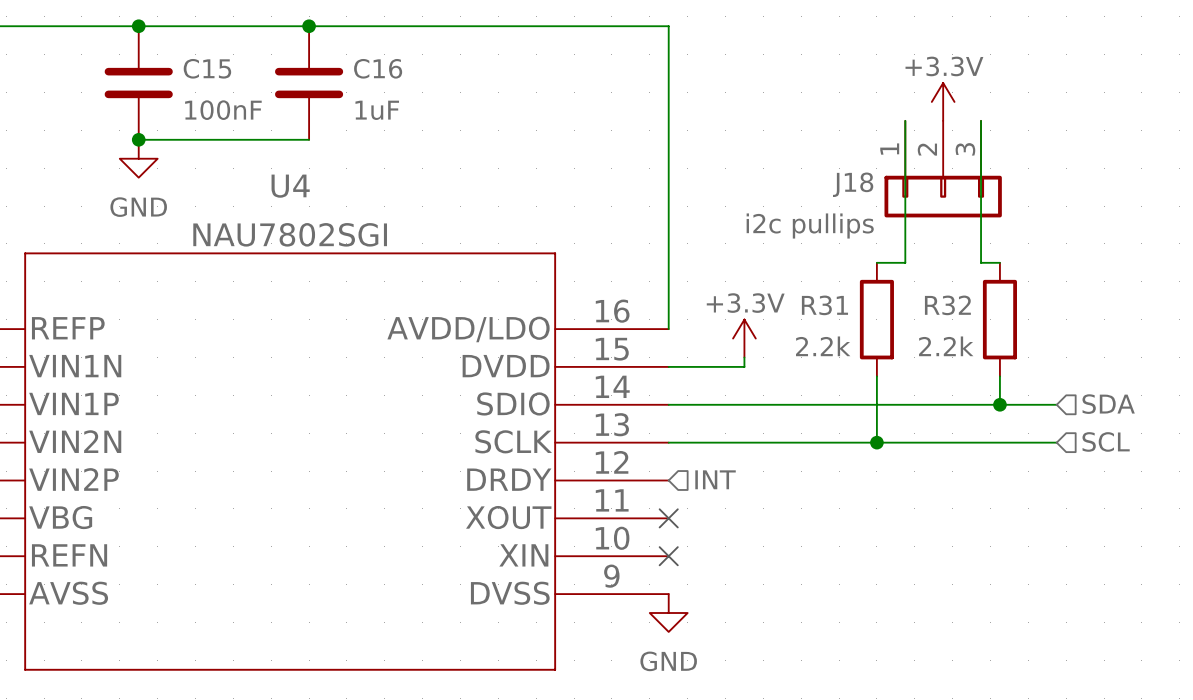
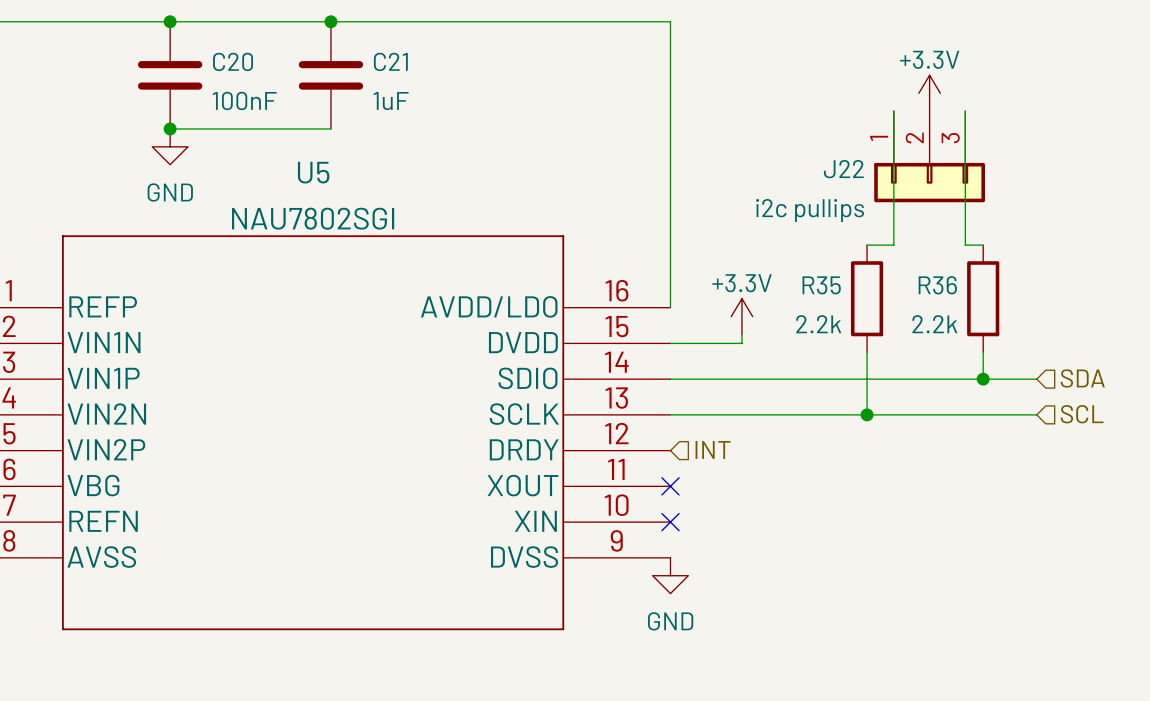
C15 name: C15 (207, 68) -> C20 (233, 61)
C16 name: C16 (378, 68) -> C21 (390, 61)
J18 name: J18 (853, 184) -> J22 (843, 169)
U4 name: U4 (290, 186) -> U5 (313, 172)
R31 name: R31 (824, 305) -> R35 (821, 285)
R32 name: R32 (947, 305) -> R36 (937, 285)

